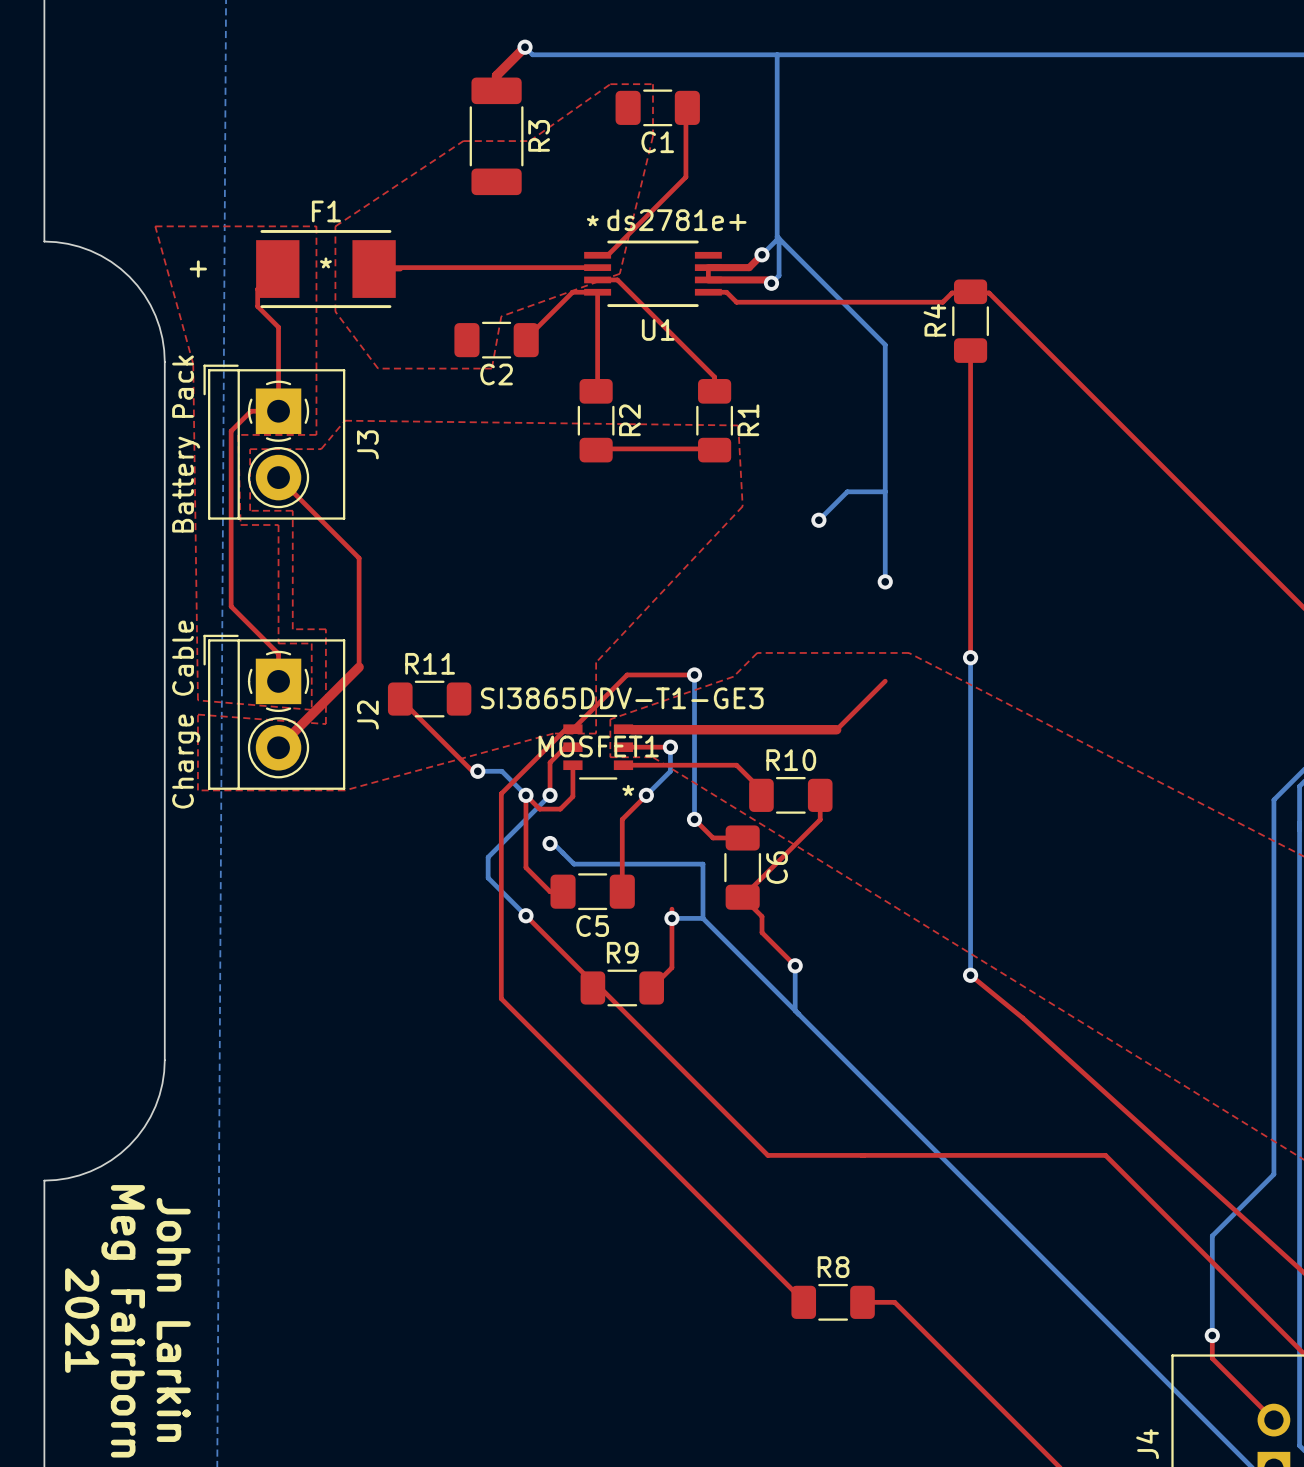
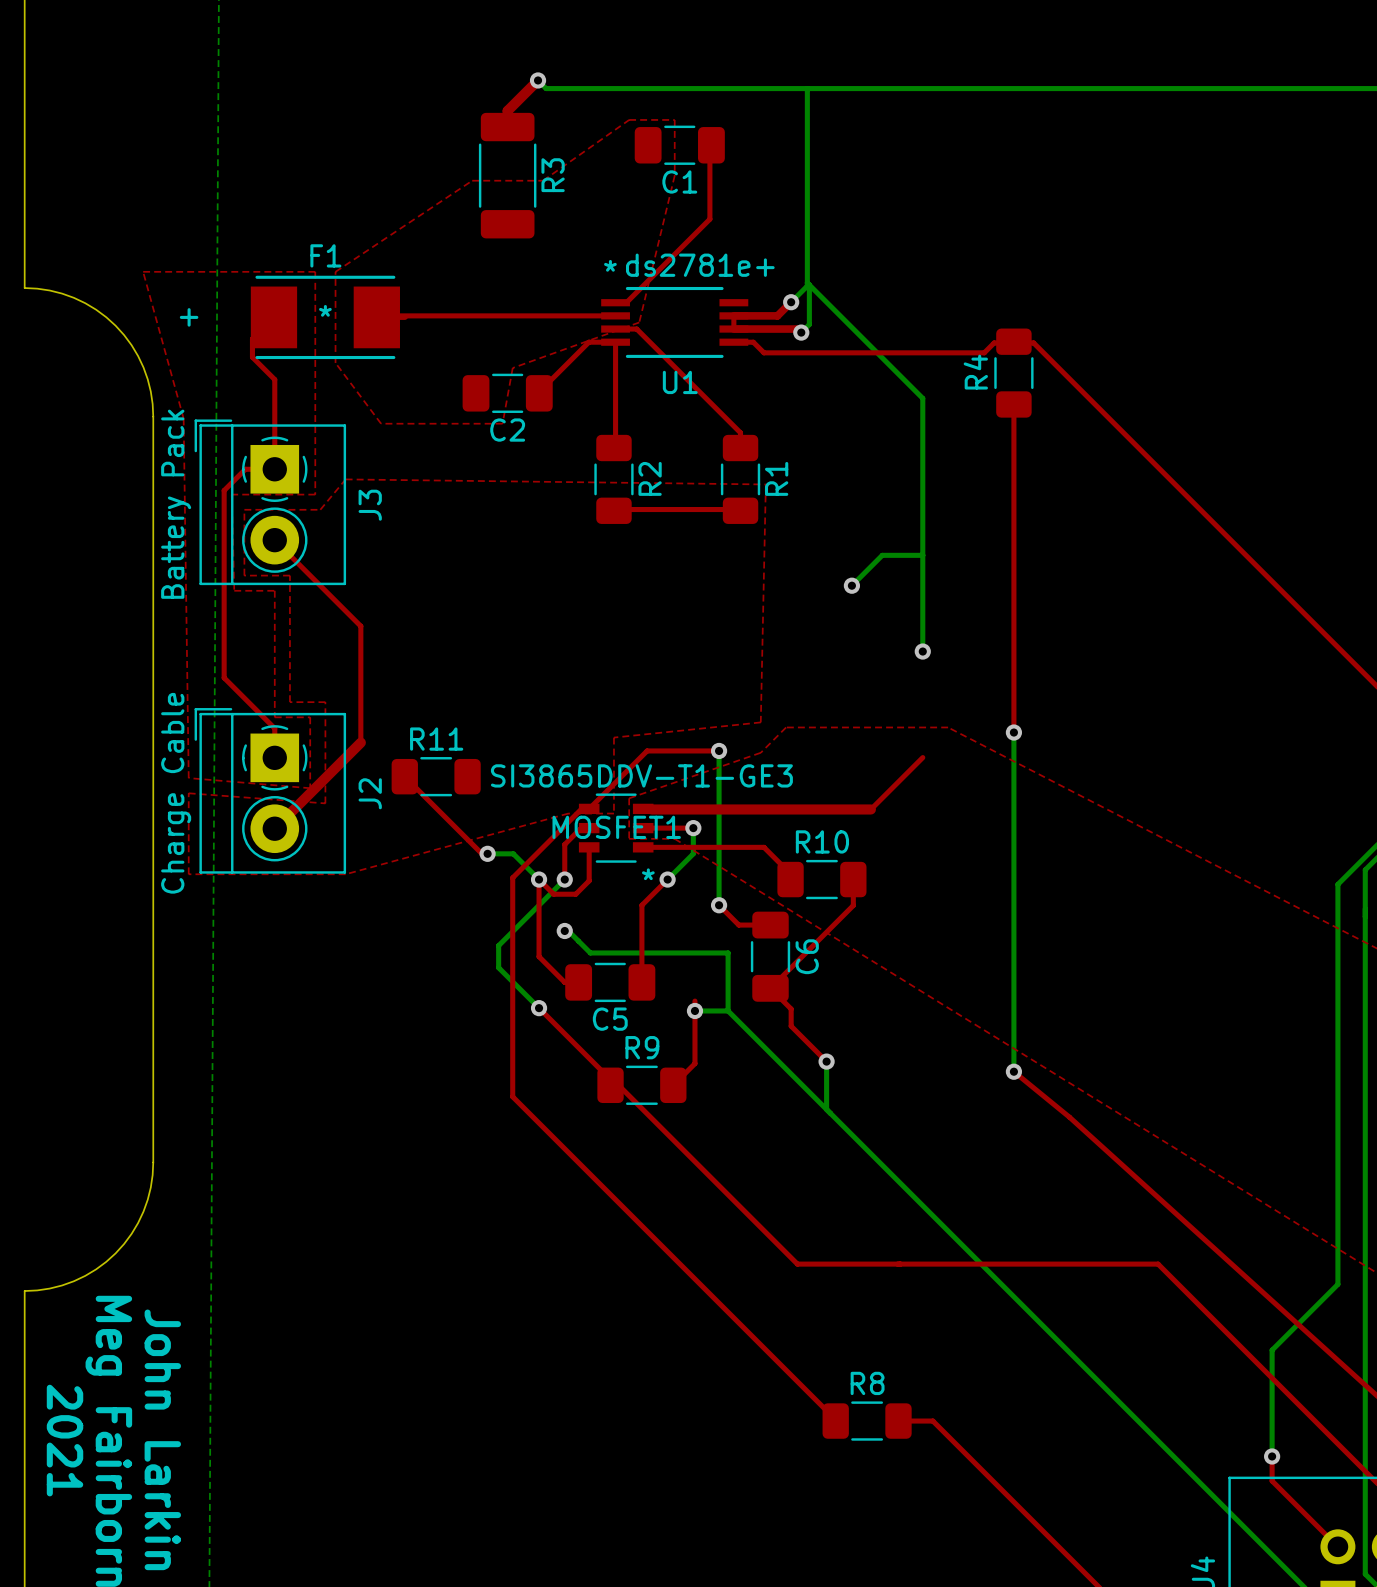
top zone outline: (738, 425) (742, 506) (596, 662) -> (765, 484) (760, 722) (613, 737)

